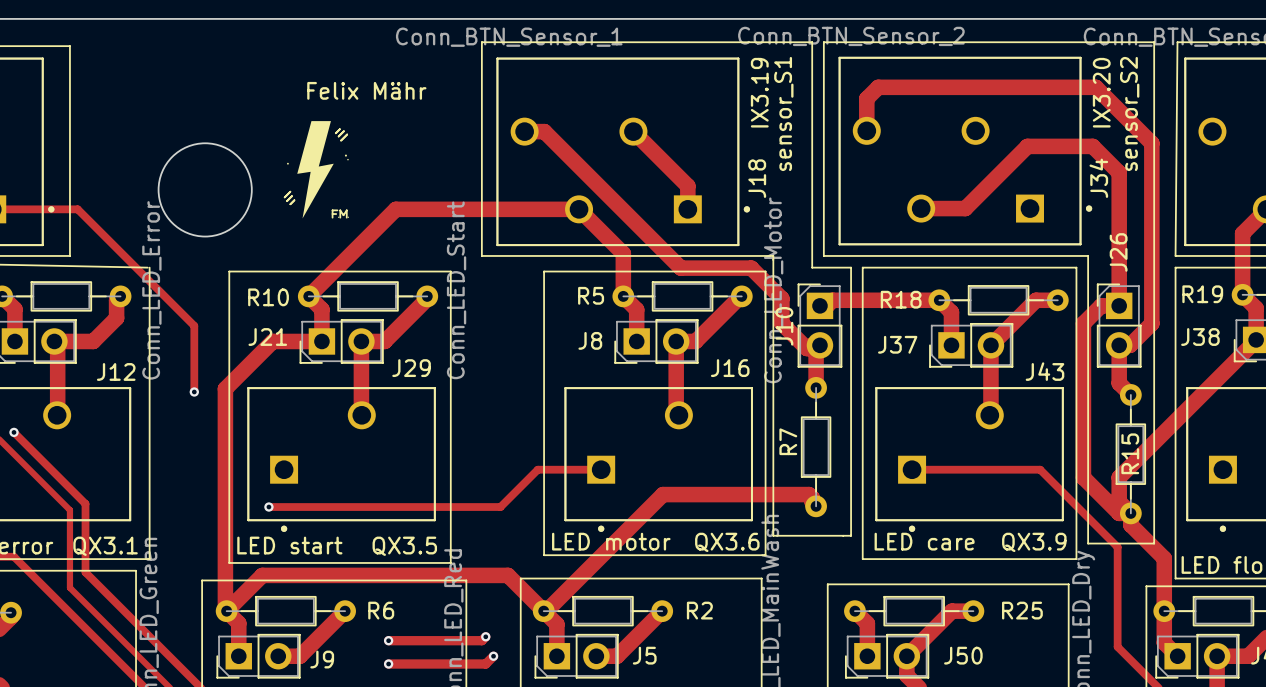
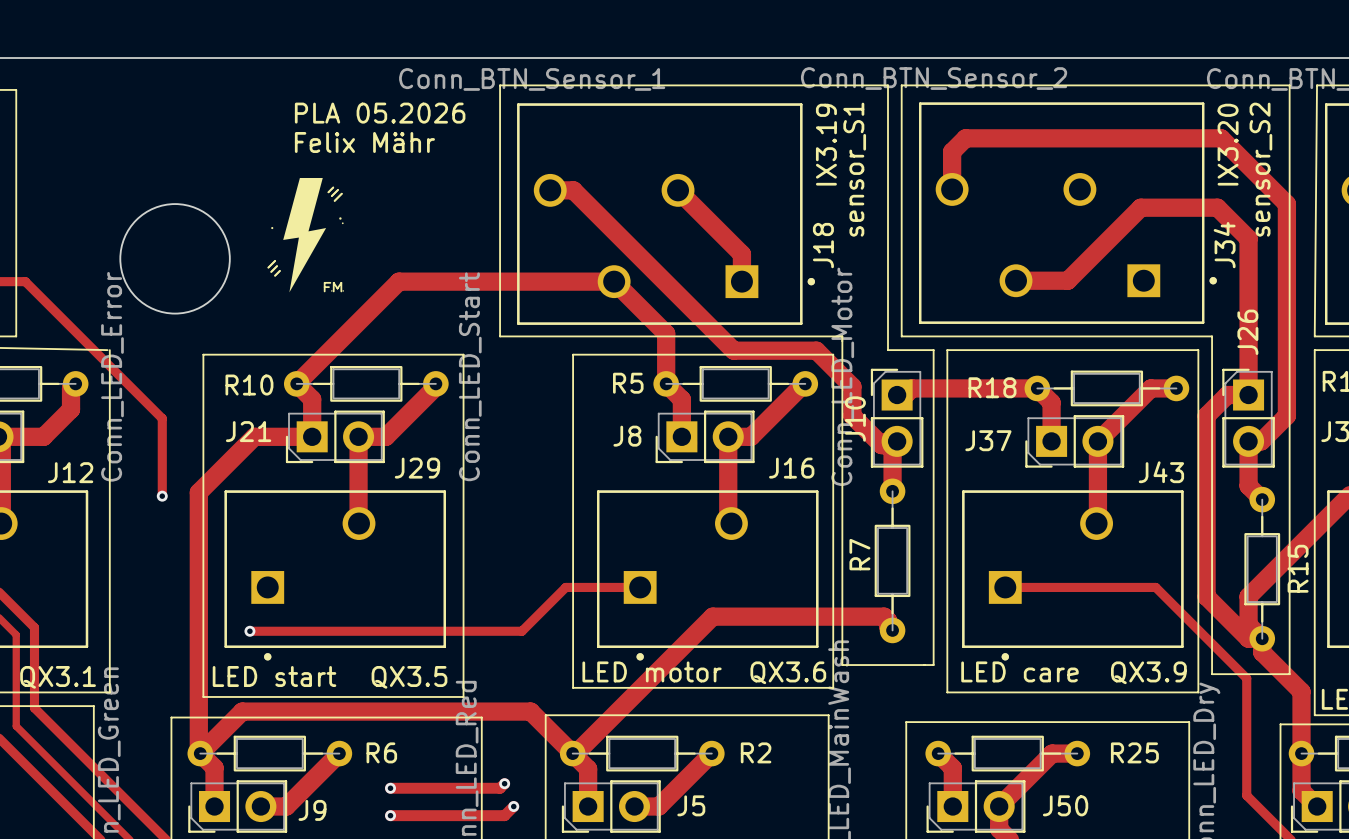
text: none -> PLA 05.2026 (380, 113)
R15 name position: R15 (1130, 453) -> R15 (1298, 568)

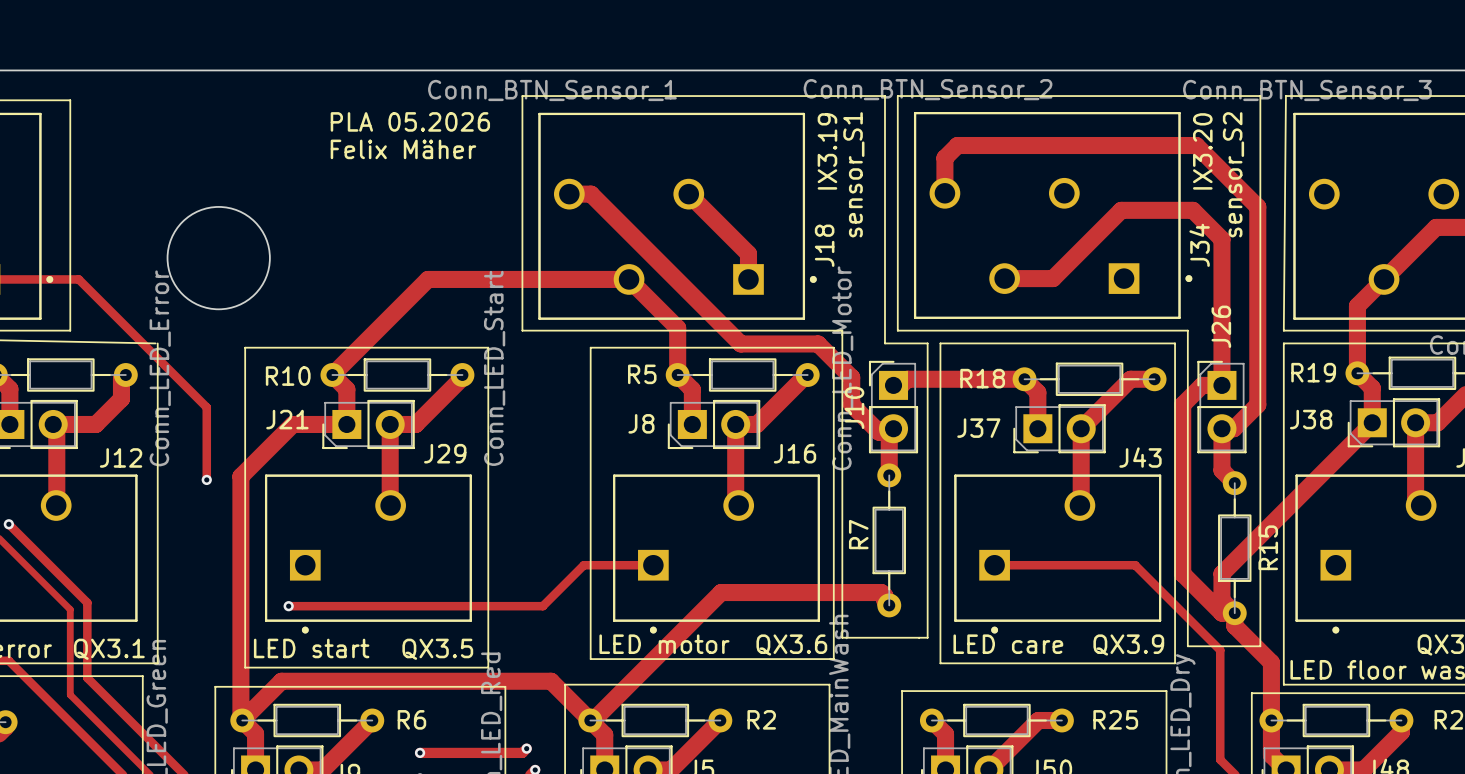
text: Felix Mähr (364, 142) -> Felix Mäher (403, 149)
drawing: [271, 178, 344, 293] -> none
line: (333, 187) (328, 192) (333, 187) -> none
line: (338, 189) (331, 196) (338, 189) -> none
line: (341, 193) (334, 200) (341, 193) -> none
line: (275, 260) (268, 267) (275, 260) -> none
line: (277, 266) (271, 271) (277, 266) -> none
line: (279, 270) (275, 275) (279, 270) -> none
line: (330, 282) (324, 282) (324, 291) -> none
line: (324, 287) (328, 287) -> none
line: (333, 291) (333, 282) (337, 288) (341, 282) (341, 291) -> none

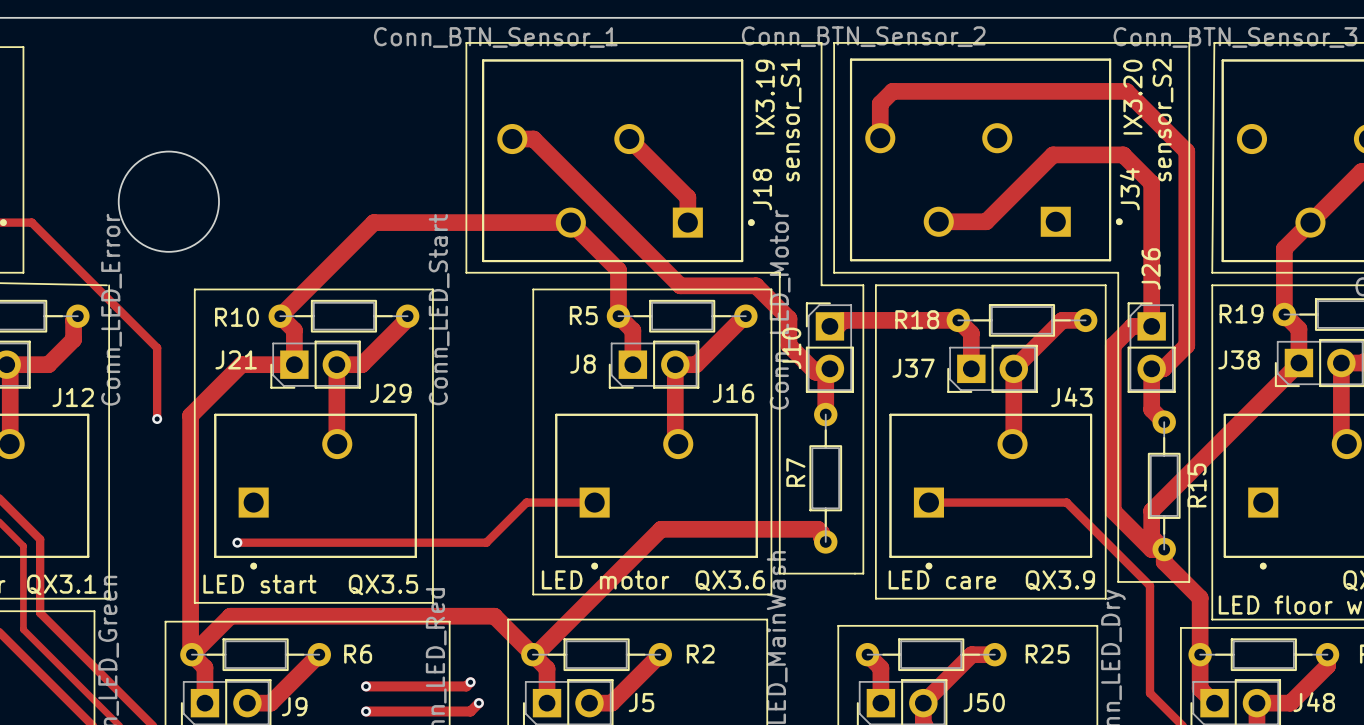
text: PLA 05.2026 (410, 121) -> none
text: Felix Mäher (403, 149) -> none

